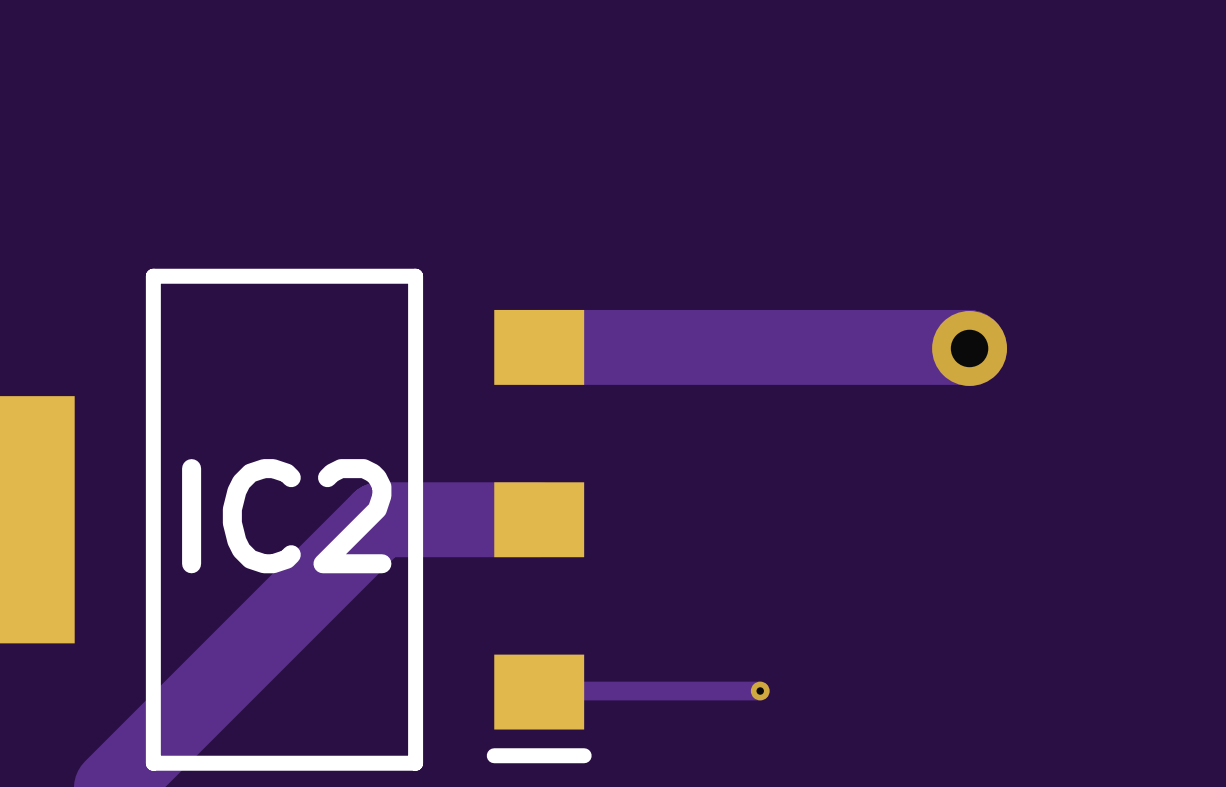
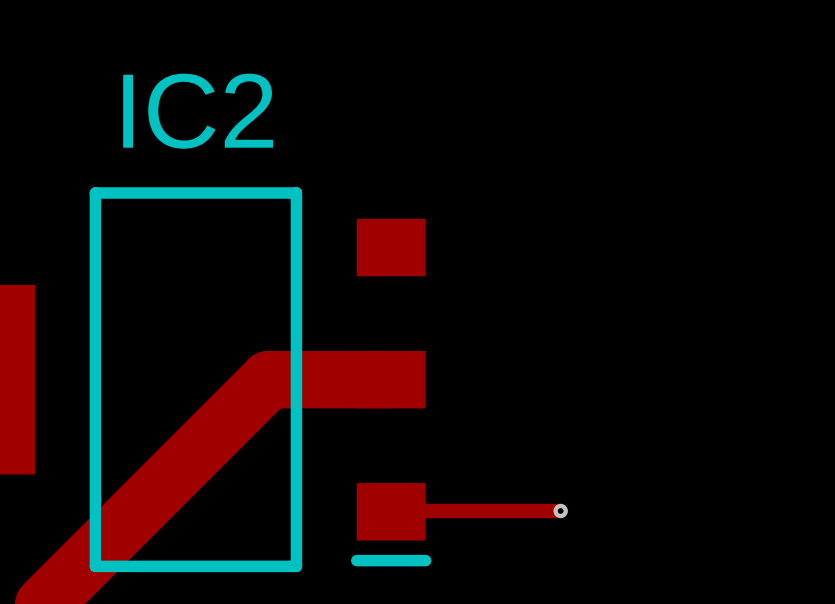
track: (539, 347) (968, 347) -> none
via: (969, 348) -> none
IC2 name position: IC2 (286, 516) -> IC2 (198, 111)

